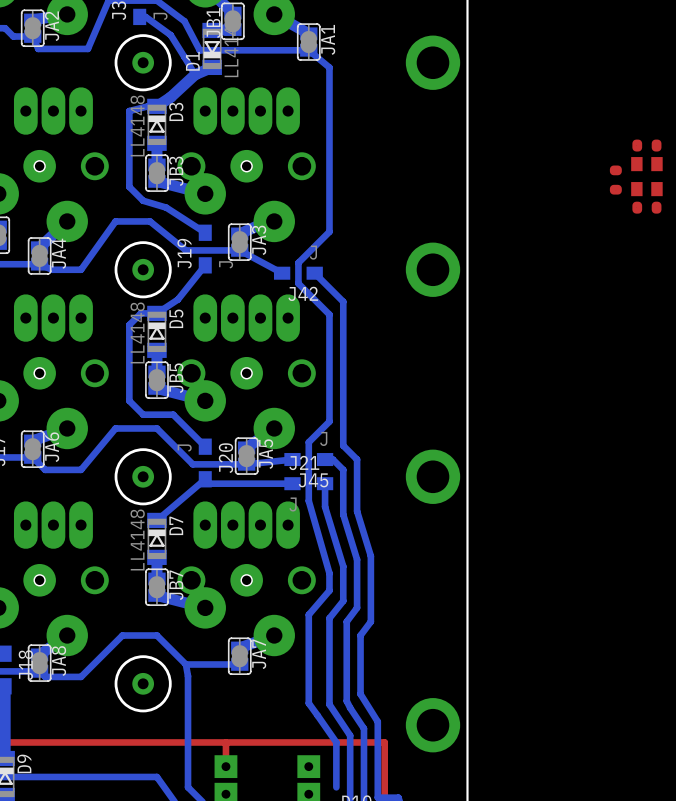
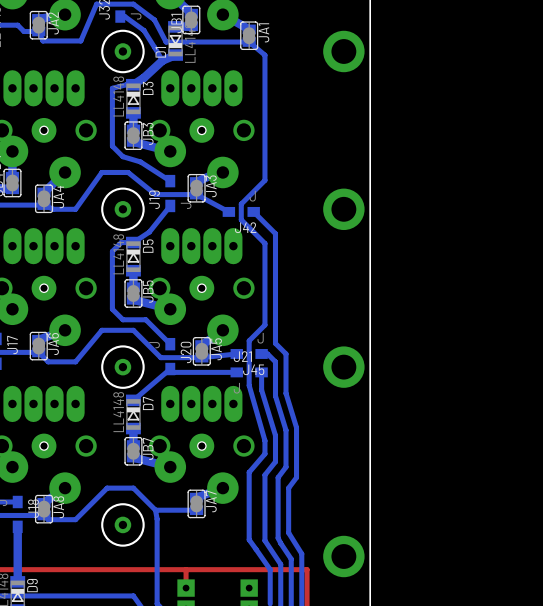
part: (646, 145) -> none
part: (646, 176) -> none
part: (615, 180) -> none
part: (646, 207) -> none

